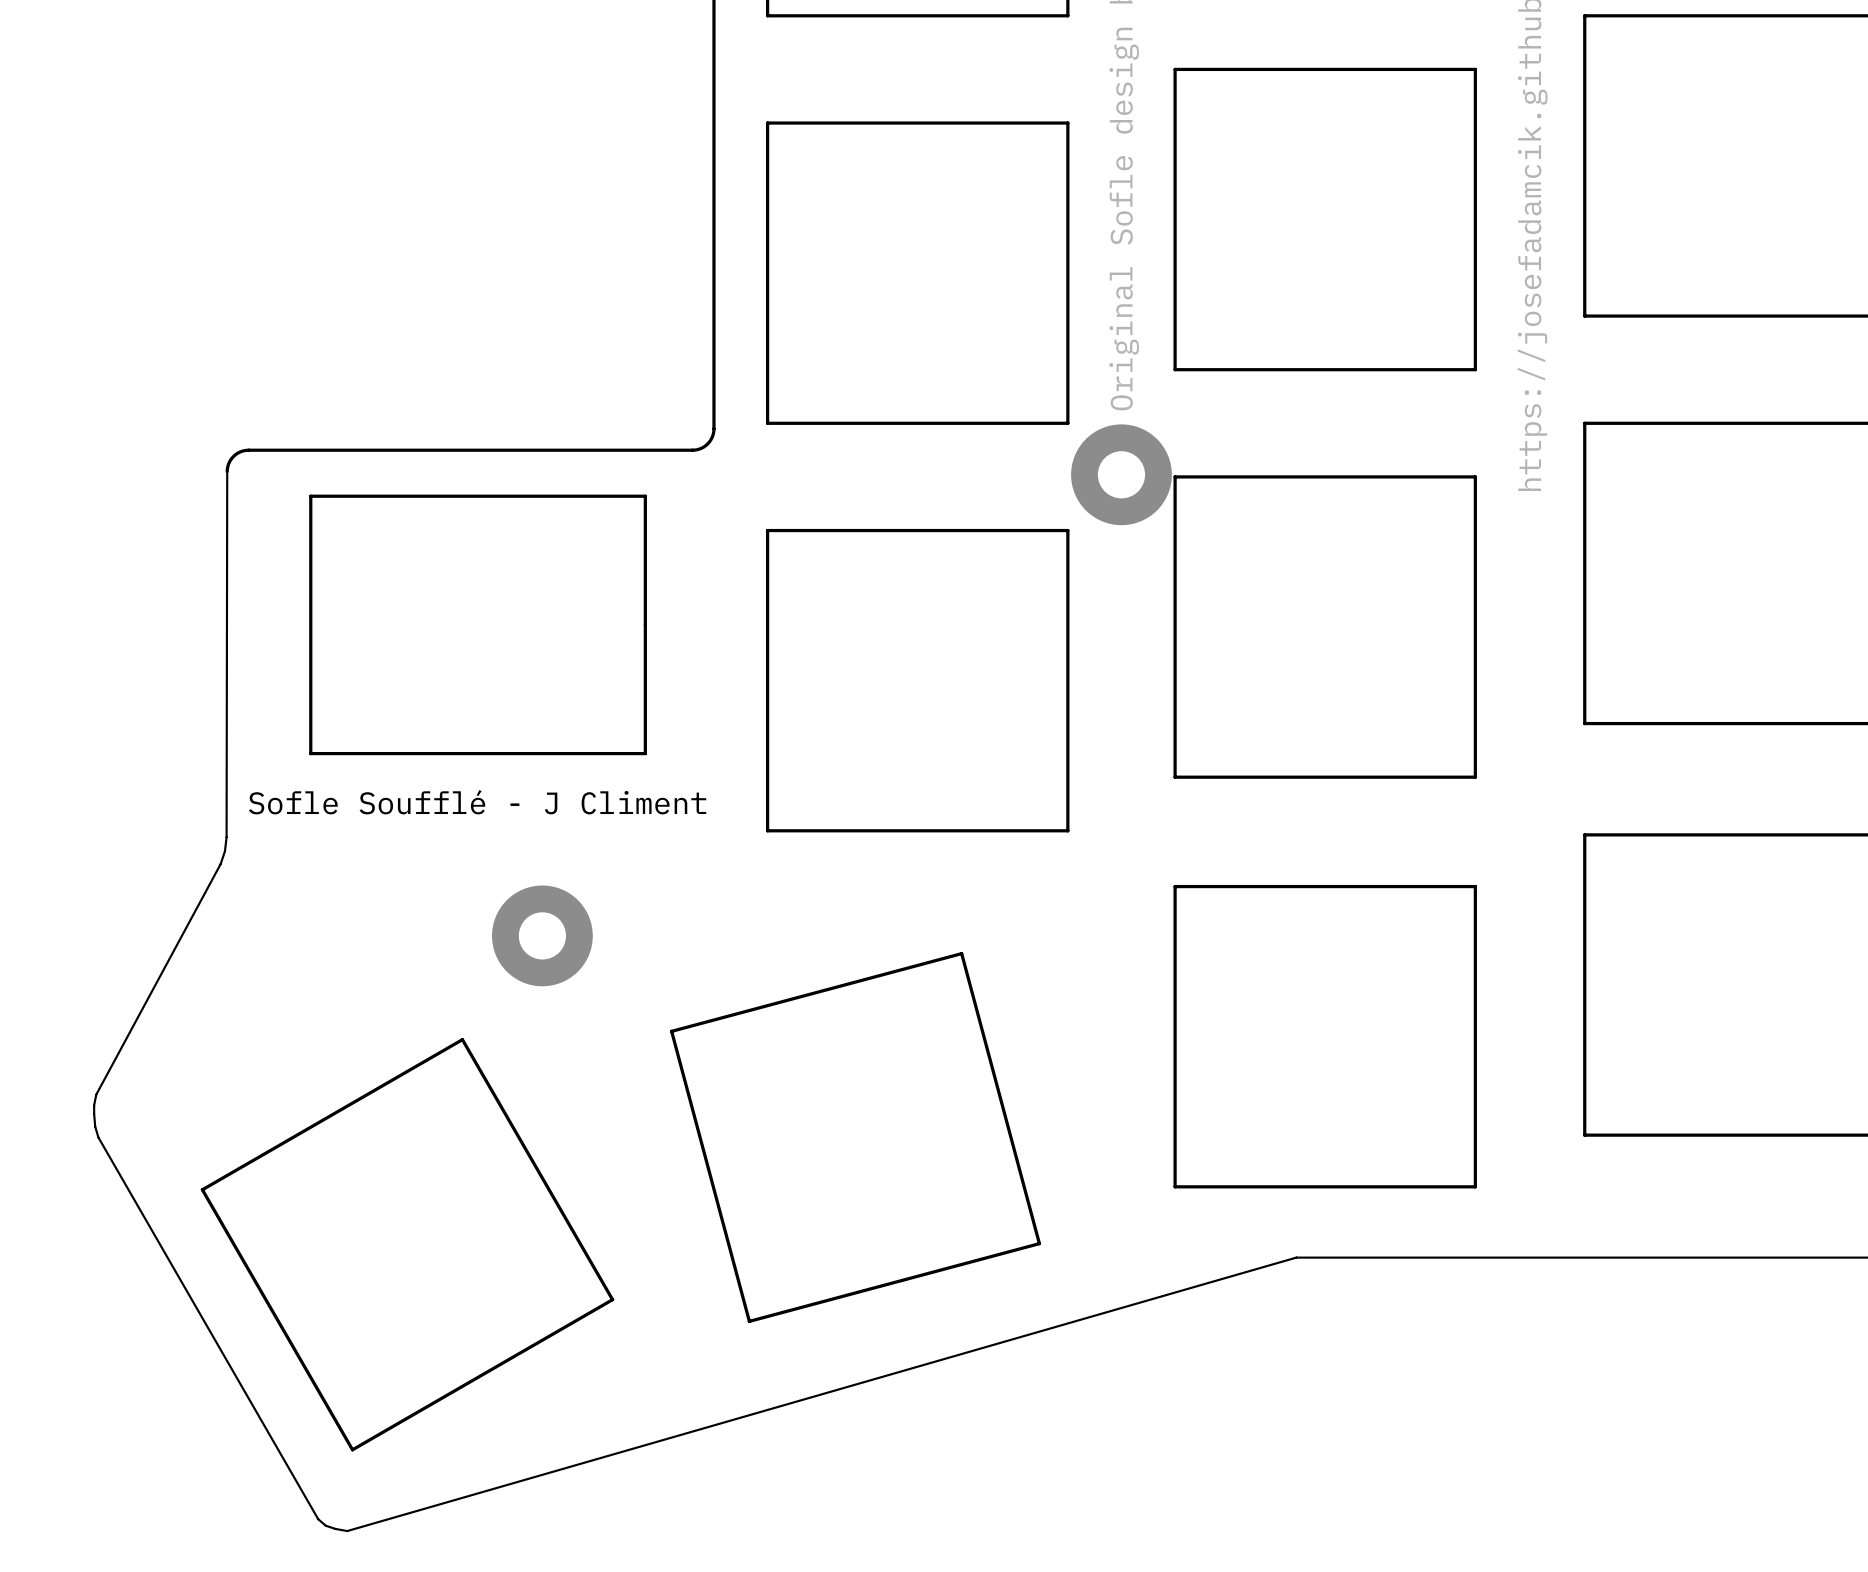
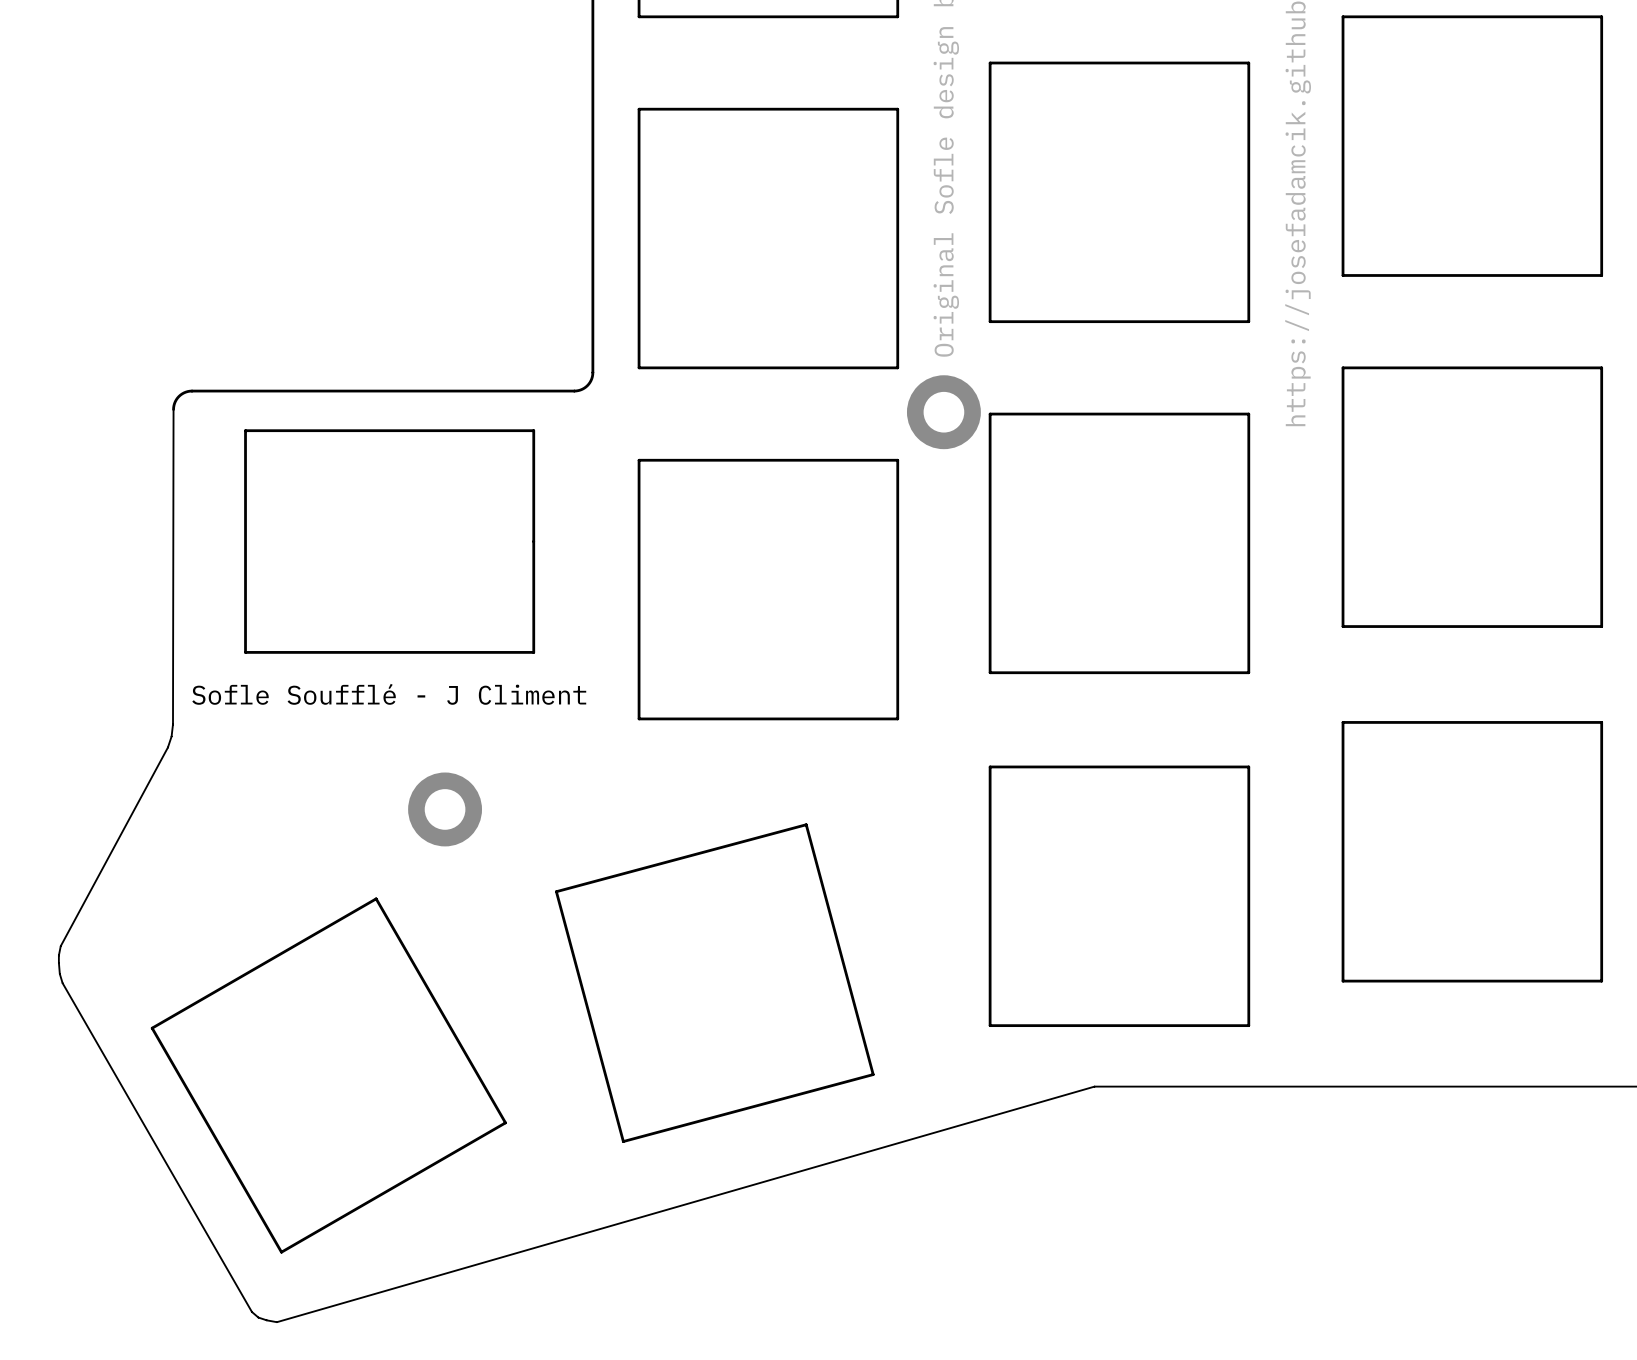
part footprint: [1071, 424, 1172, 526] -> [906, 375, 981, 450]
part footprint: [491, 885, 593, 987] -> [408, 772, 483, 847]

